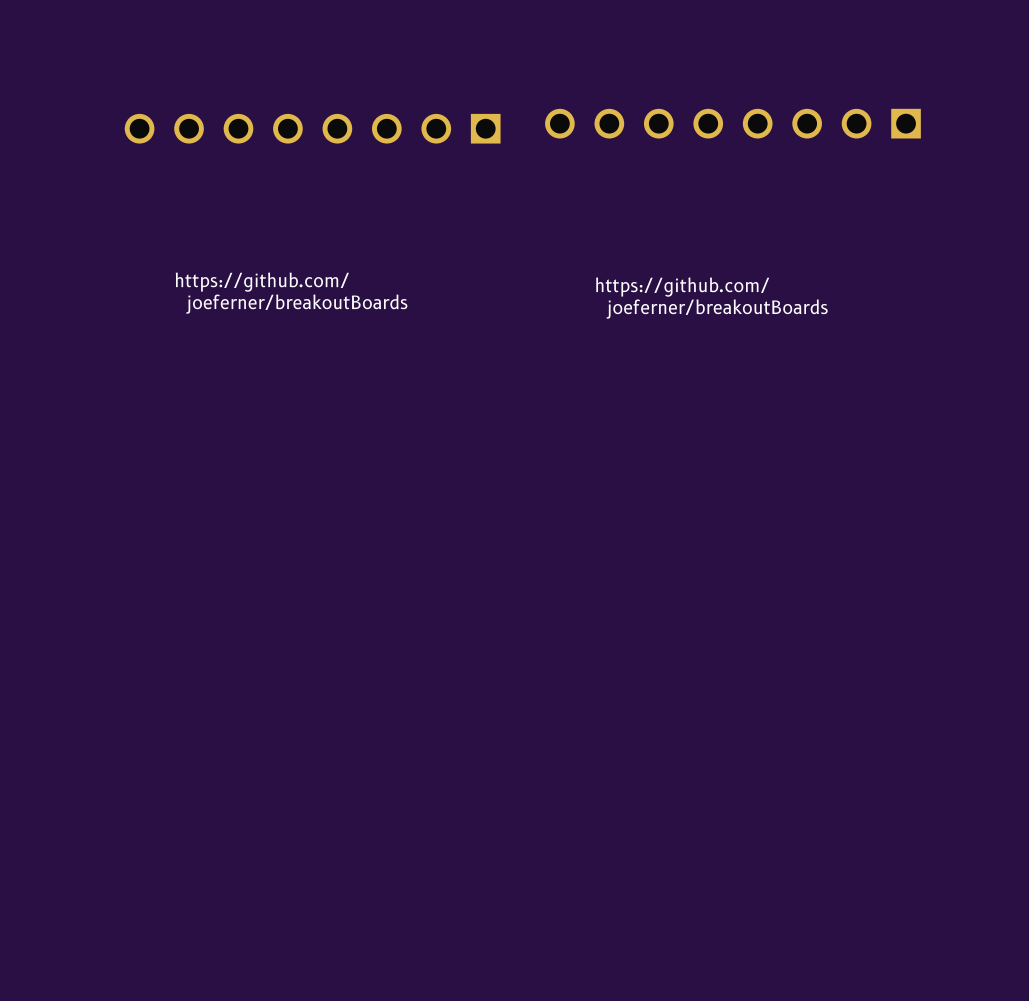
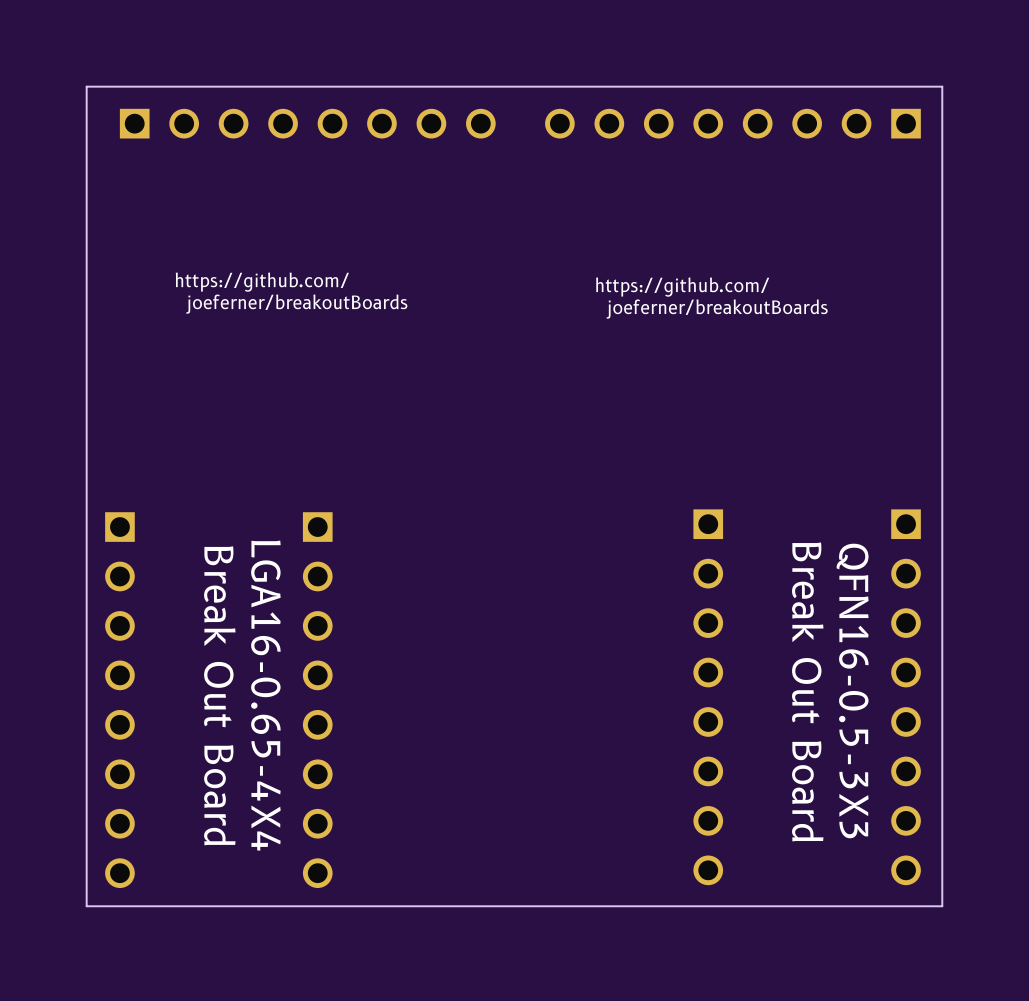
board edge: none -> (942, 86) (942, 906) (86, 906) (86, 86) (942, 86)
part rotation: 0° (312, 128) -> 180° (307, 123)
text: none -> QFN16-0.5-3X3 (852, 690)
text: none -> Break Out Board (807, 691)
text: none -> Break Out Board (219, 695)
text: none -> LGA16-0.65-4X4 (265, 695)
part: none -> (708, 697)
part: none -> (906, 697)
part: none -> (119, 700)
part: none -> (317, 700)

